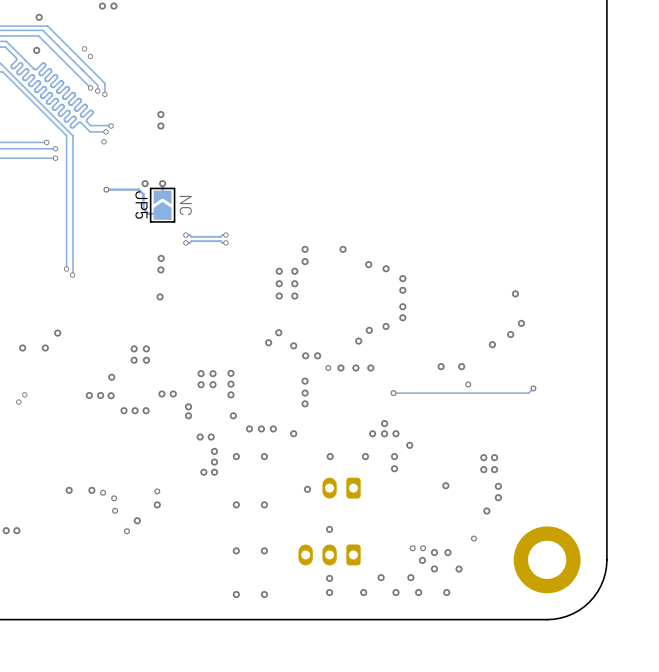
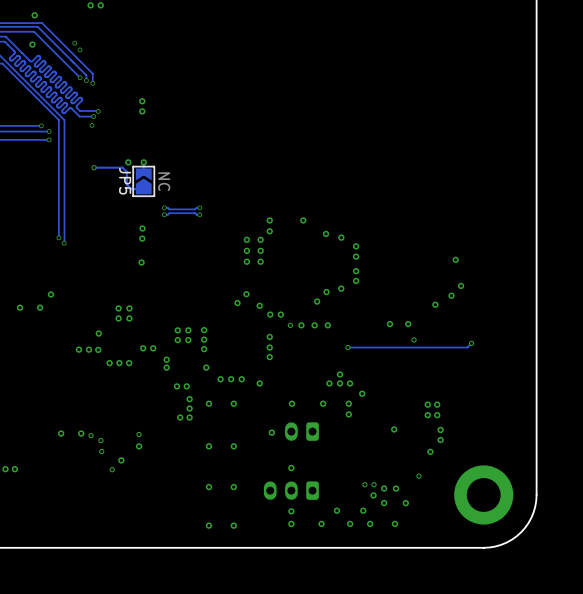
via: (24, 394) -> none
via: (18, 402) -> none

